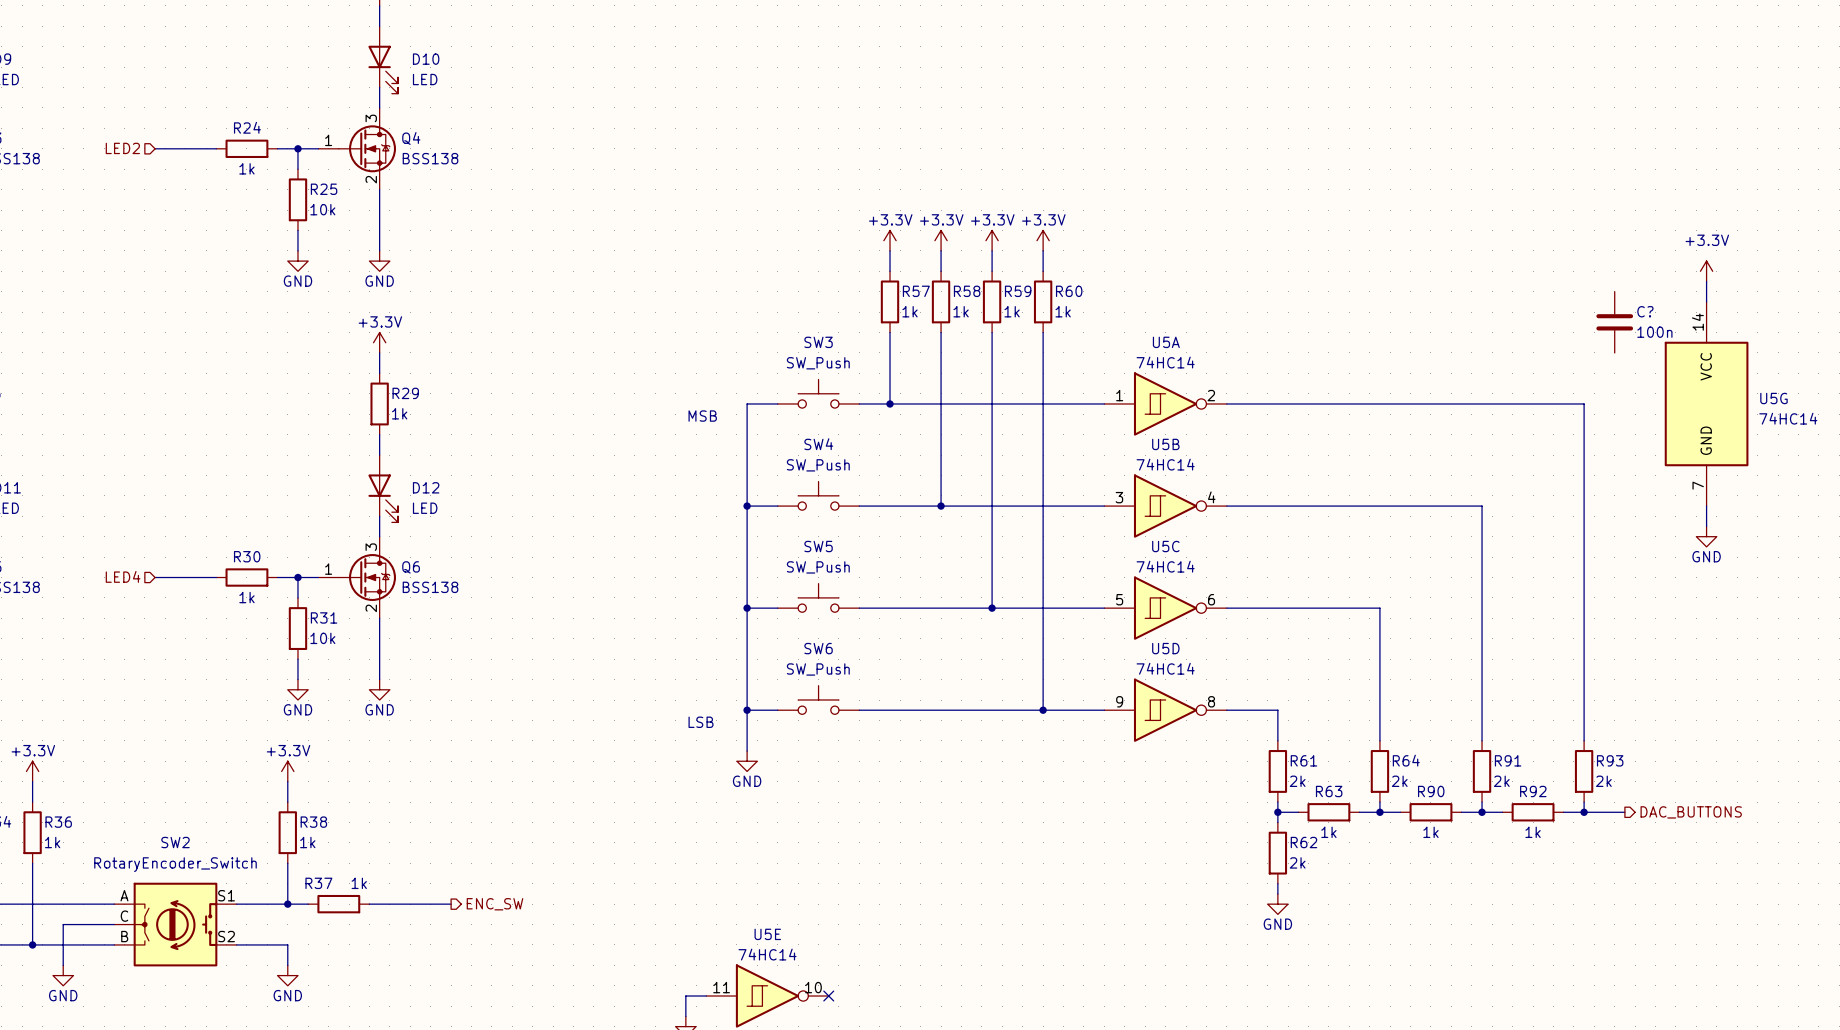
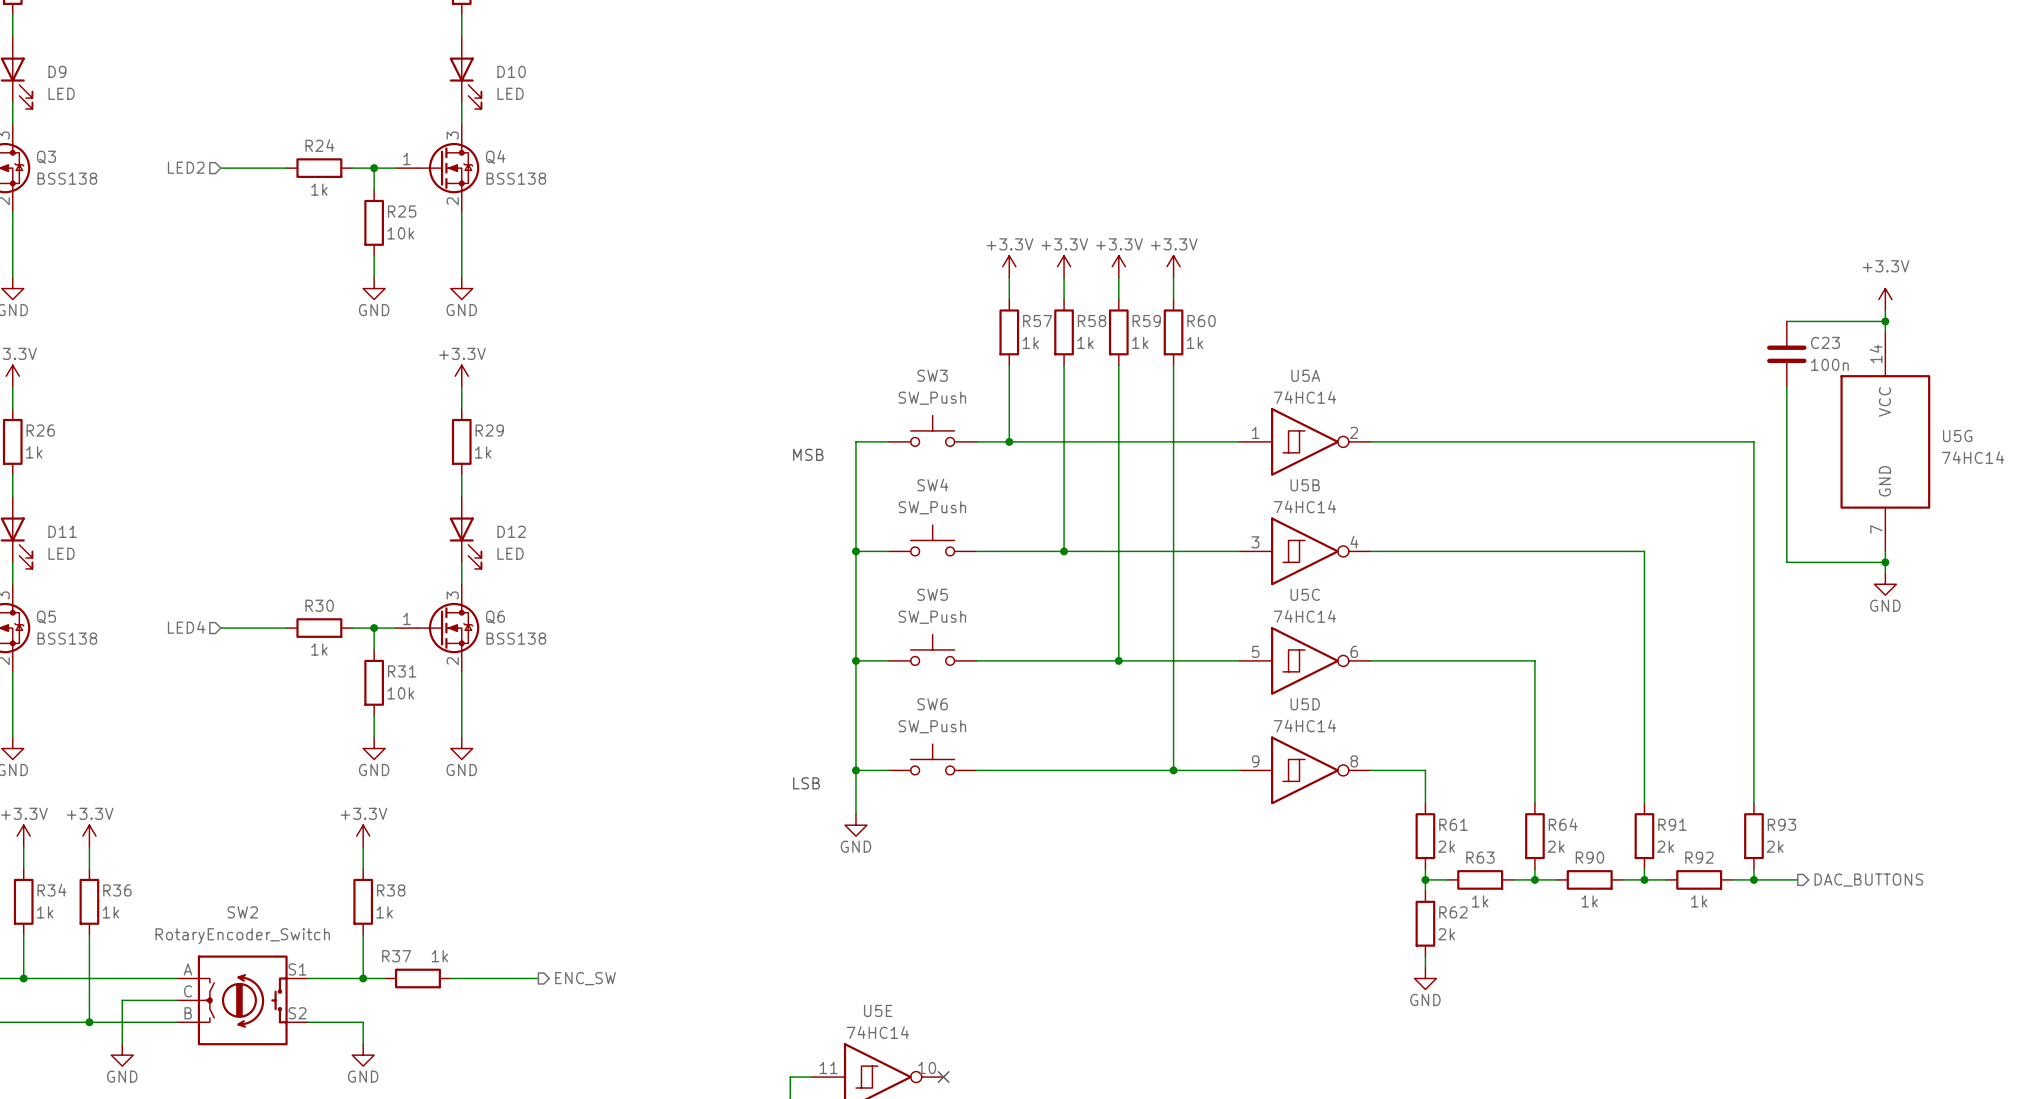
wire: none -> (1786, 321) (1885, 321)
junction: none -> (1885, 321)
C? name: C? (1645, 311) -> C23 (1825, 342)
wire: none -> (1786, 387) (1786, 562) (1885, 562)
junction: none -> (1885, 562)

